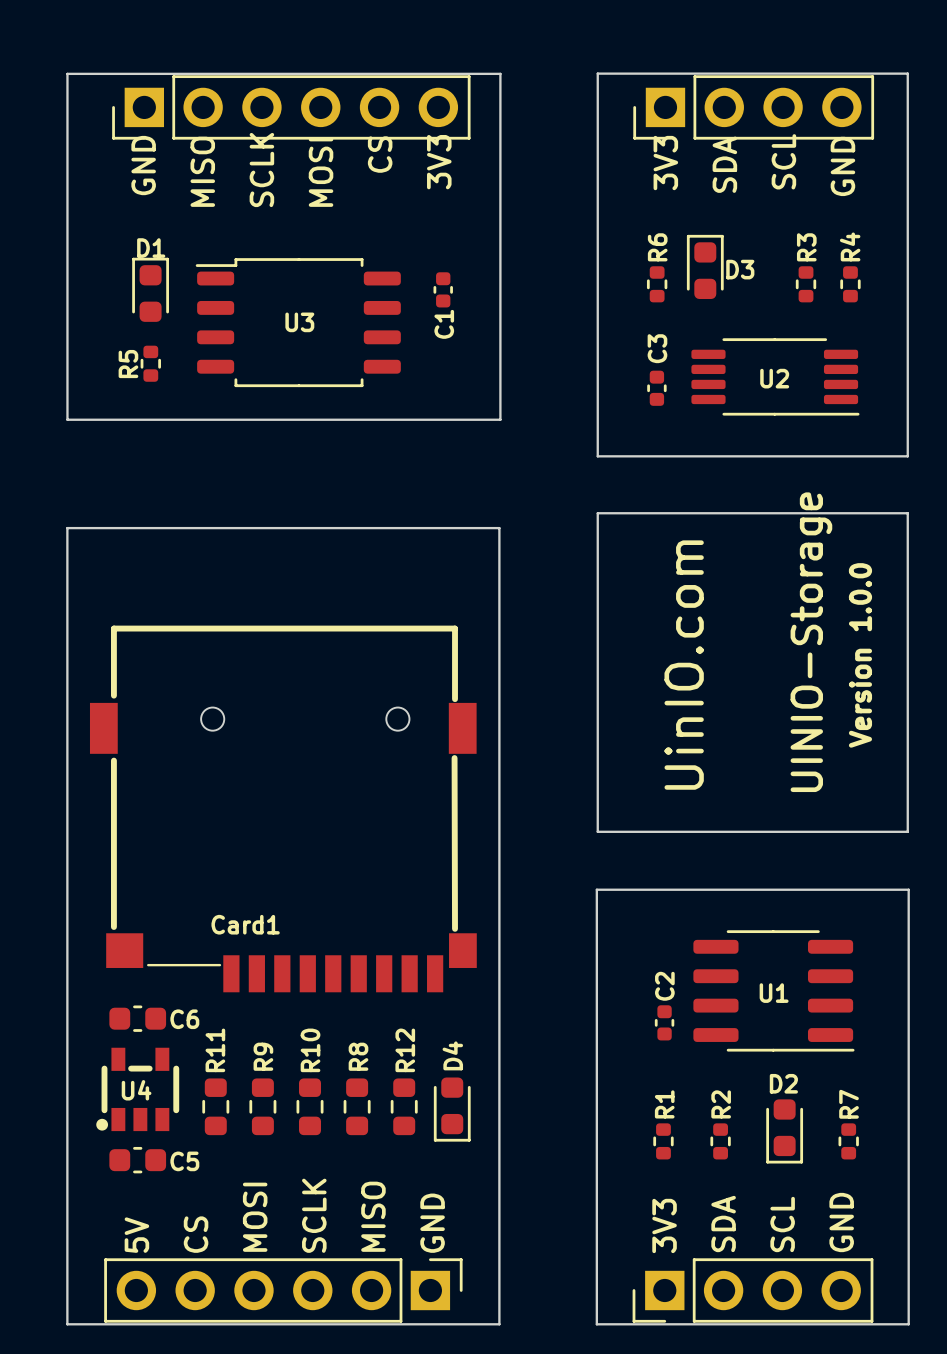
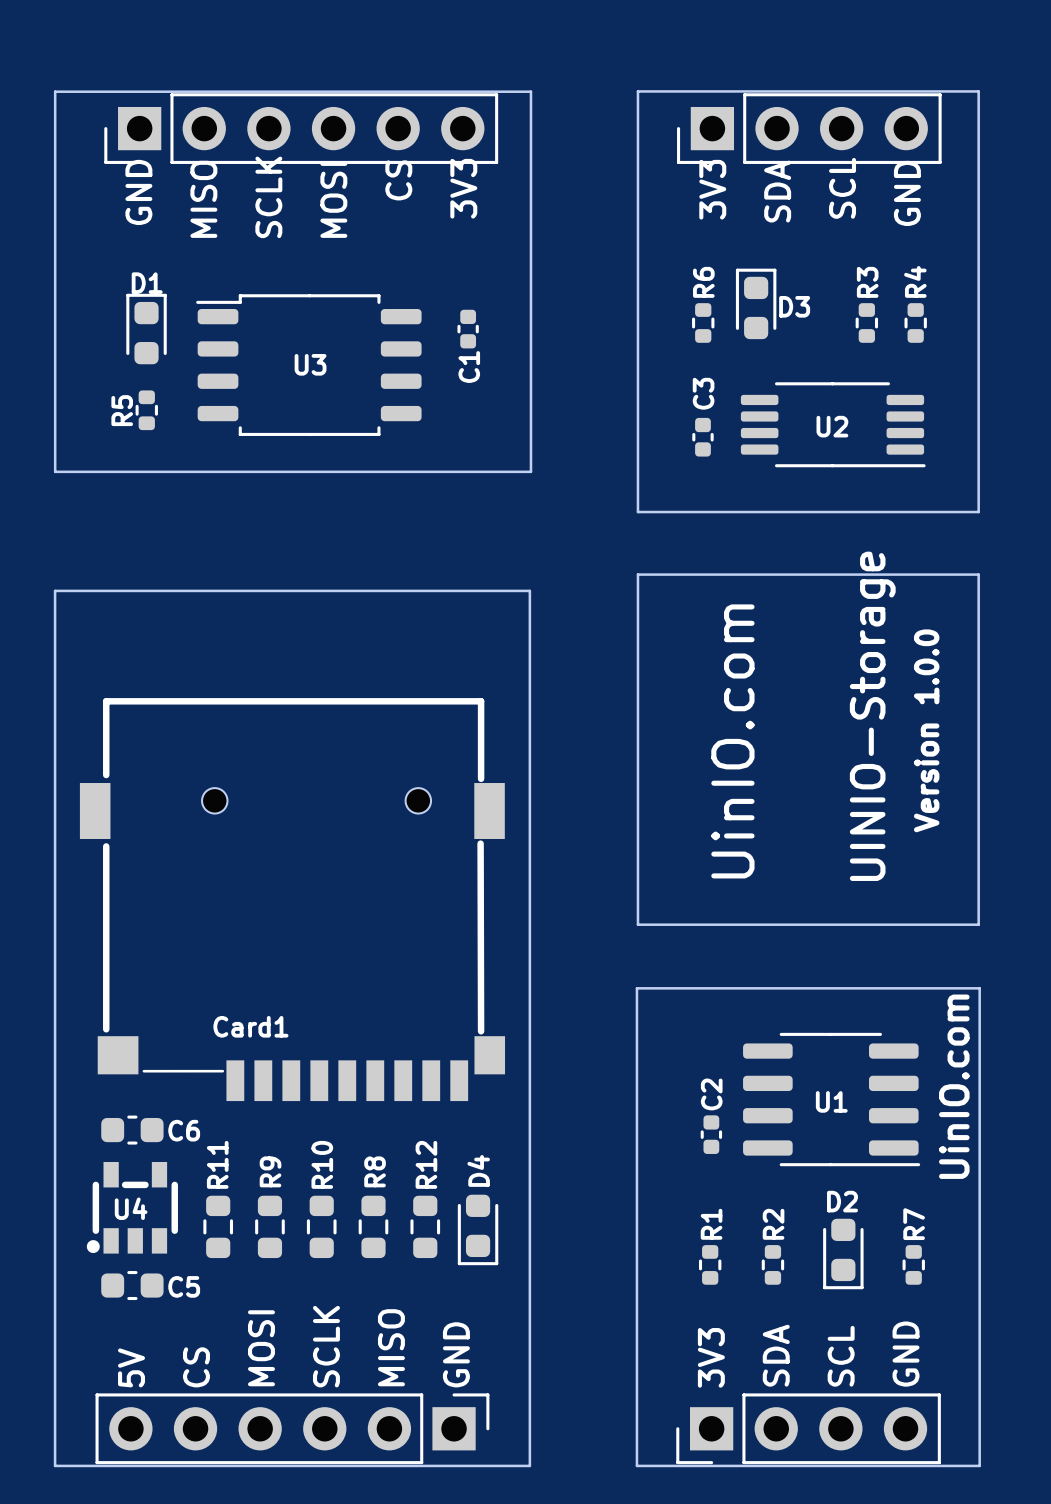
text: none -> UinIO.com (954, 1086)

